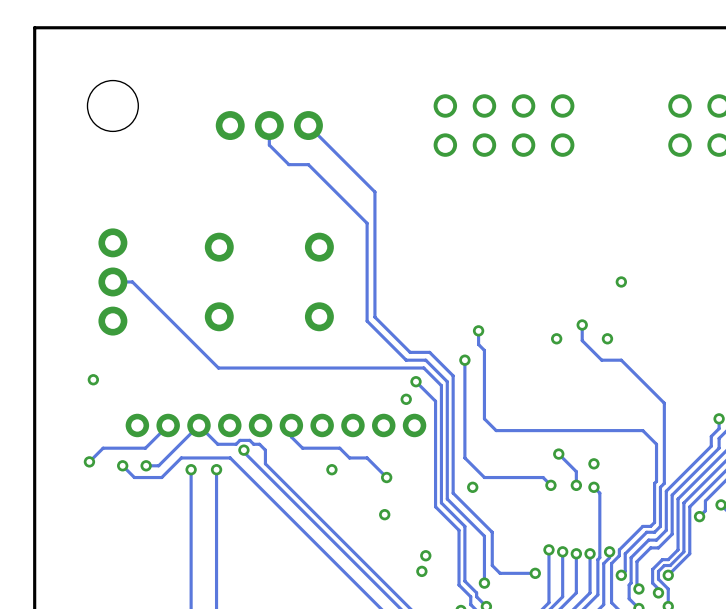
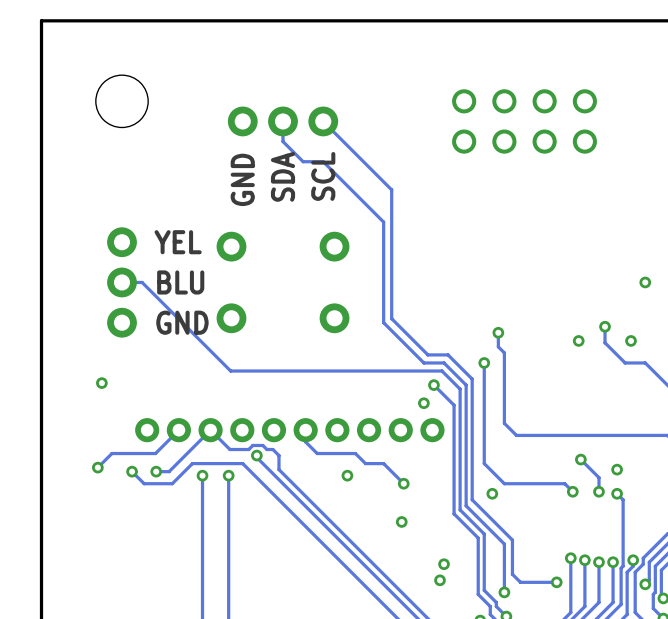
text: none -> SCL (323, 176)
text: none -> SDA (283, 176)
text: none -> GND (242, 179)
text: none -> YEL (178, 242)
text: none -> BLU (180, 282)
text: none -> GND (182, 322)

